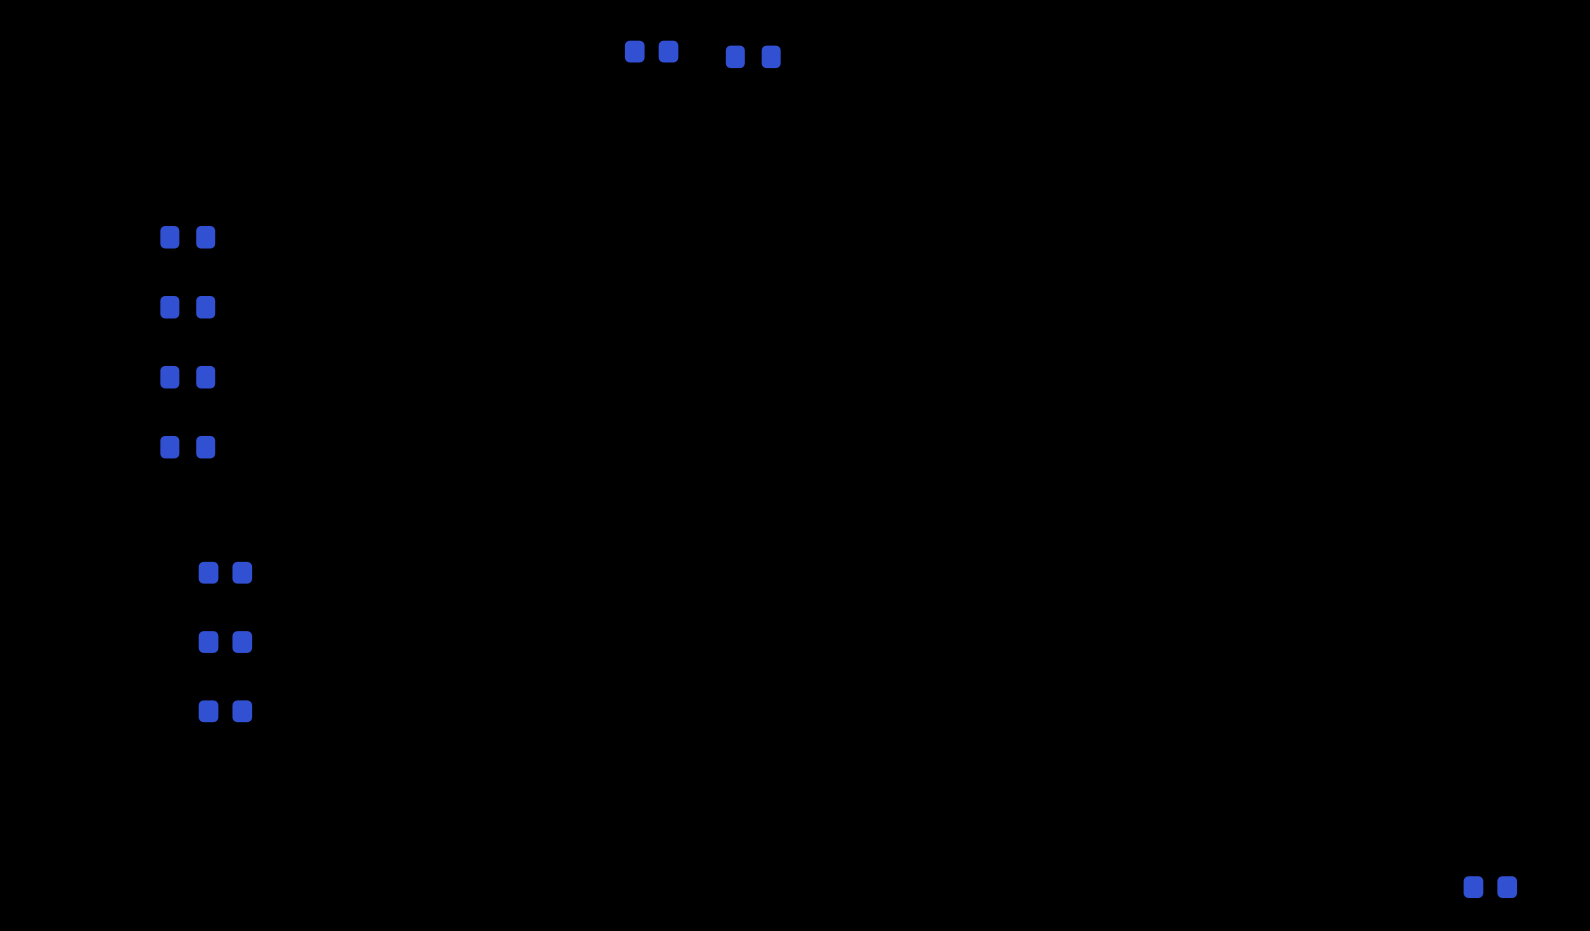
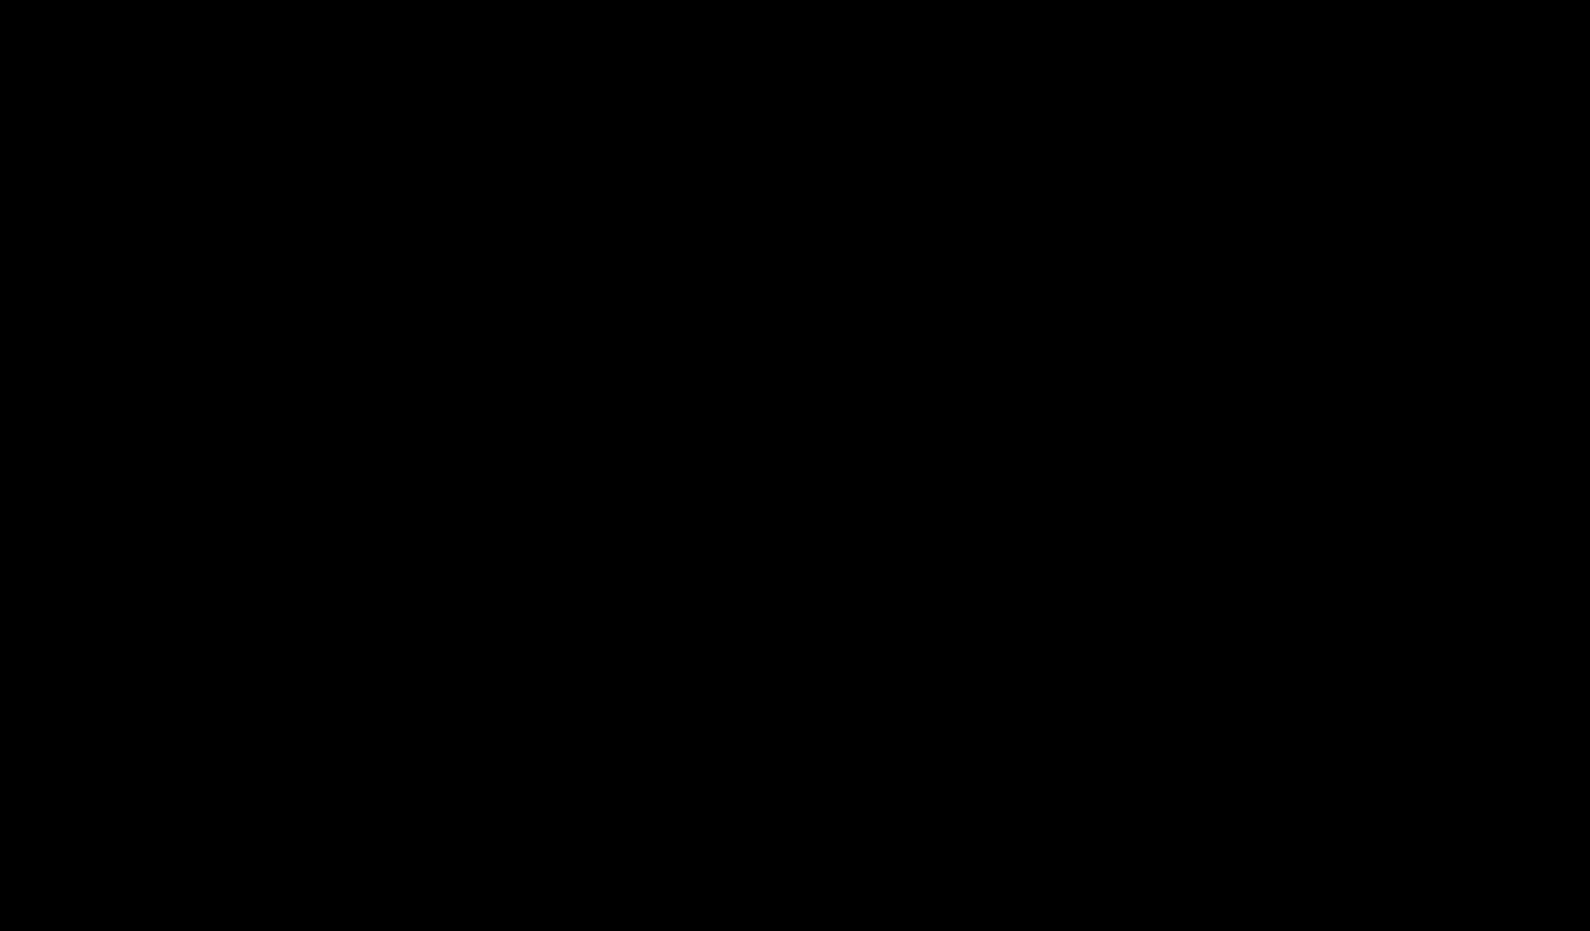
part: (651, 51) -> none
part: (753, 56) -> none
part: (187, 237) -> none
part: (187, 307) -> none
part: (187, 377) -> none
part: (187, 447) -> none
part: (225, 572) -> none
part: (225, 642) -> none
part: (225, 711) -> none
part: (1490, 887) -> none

